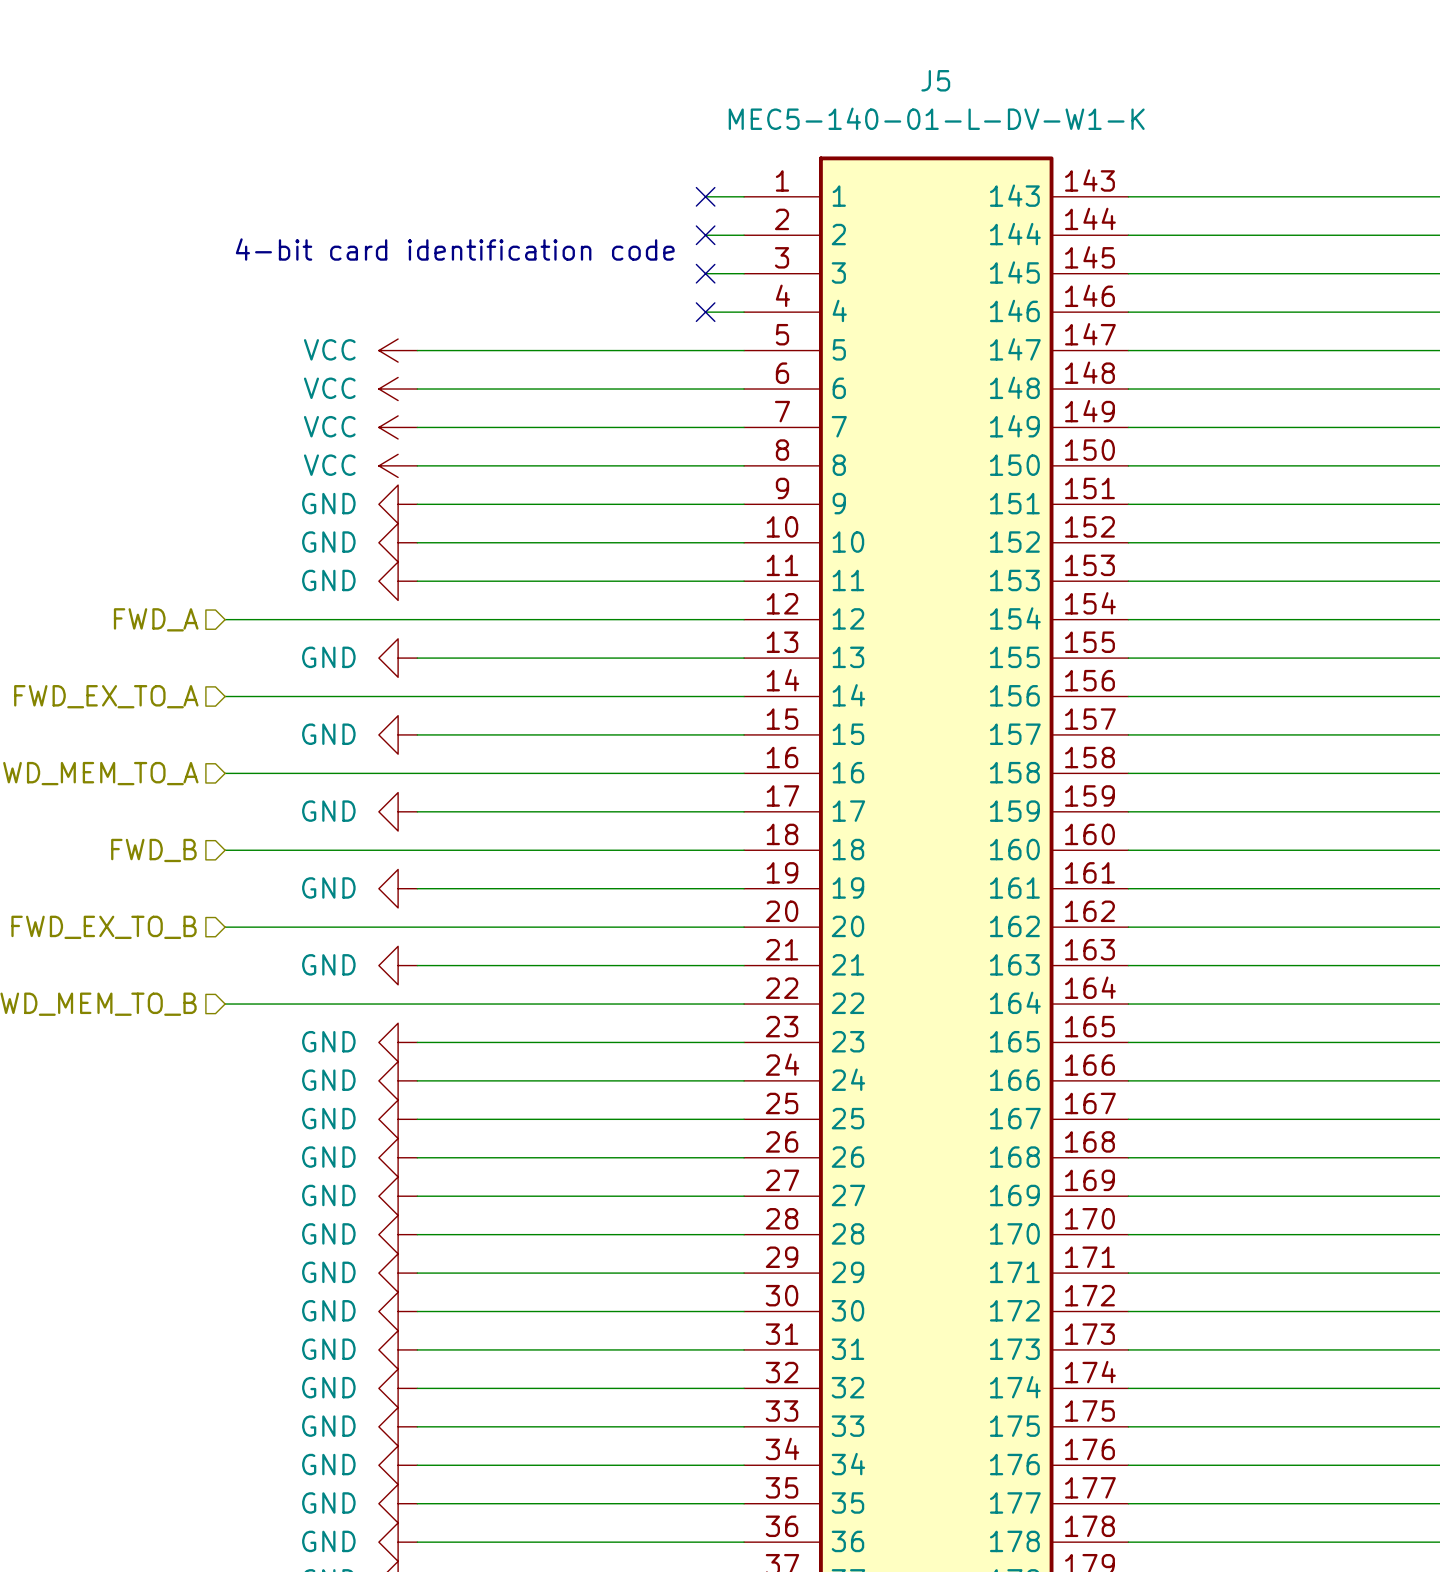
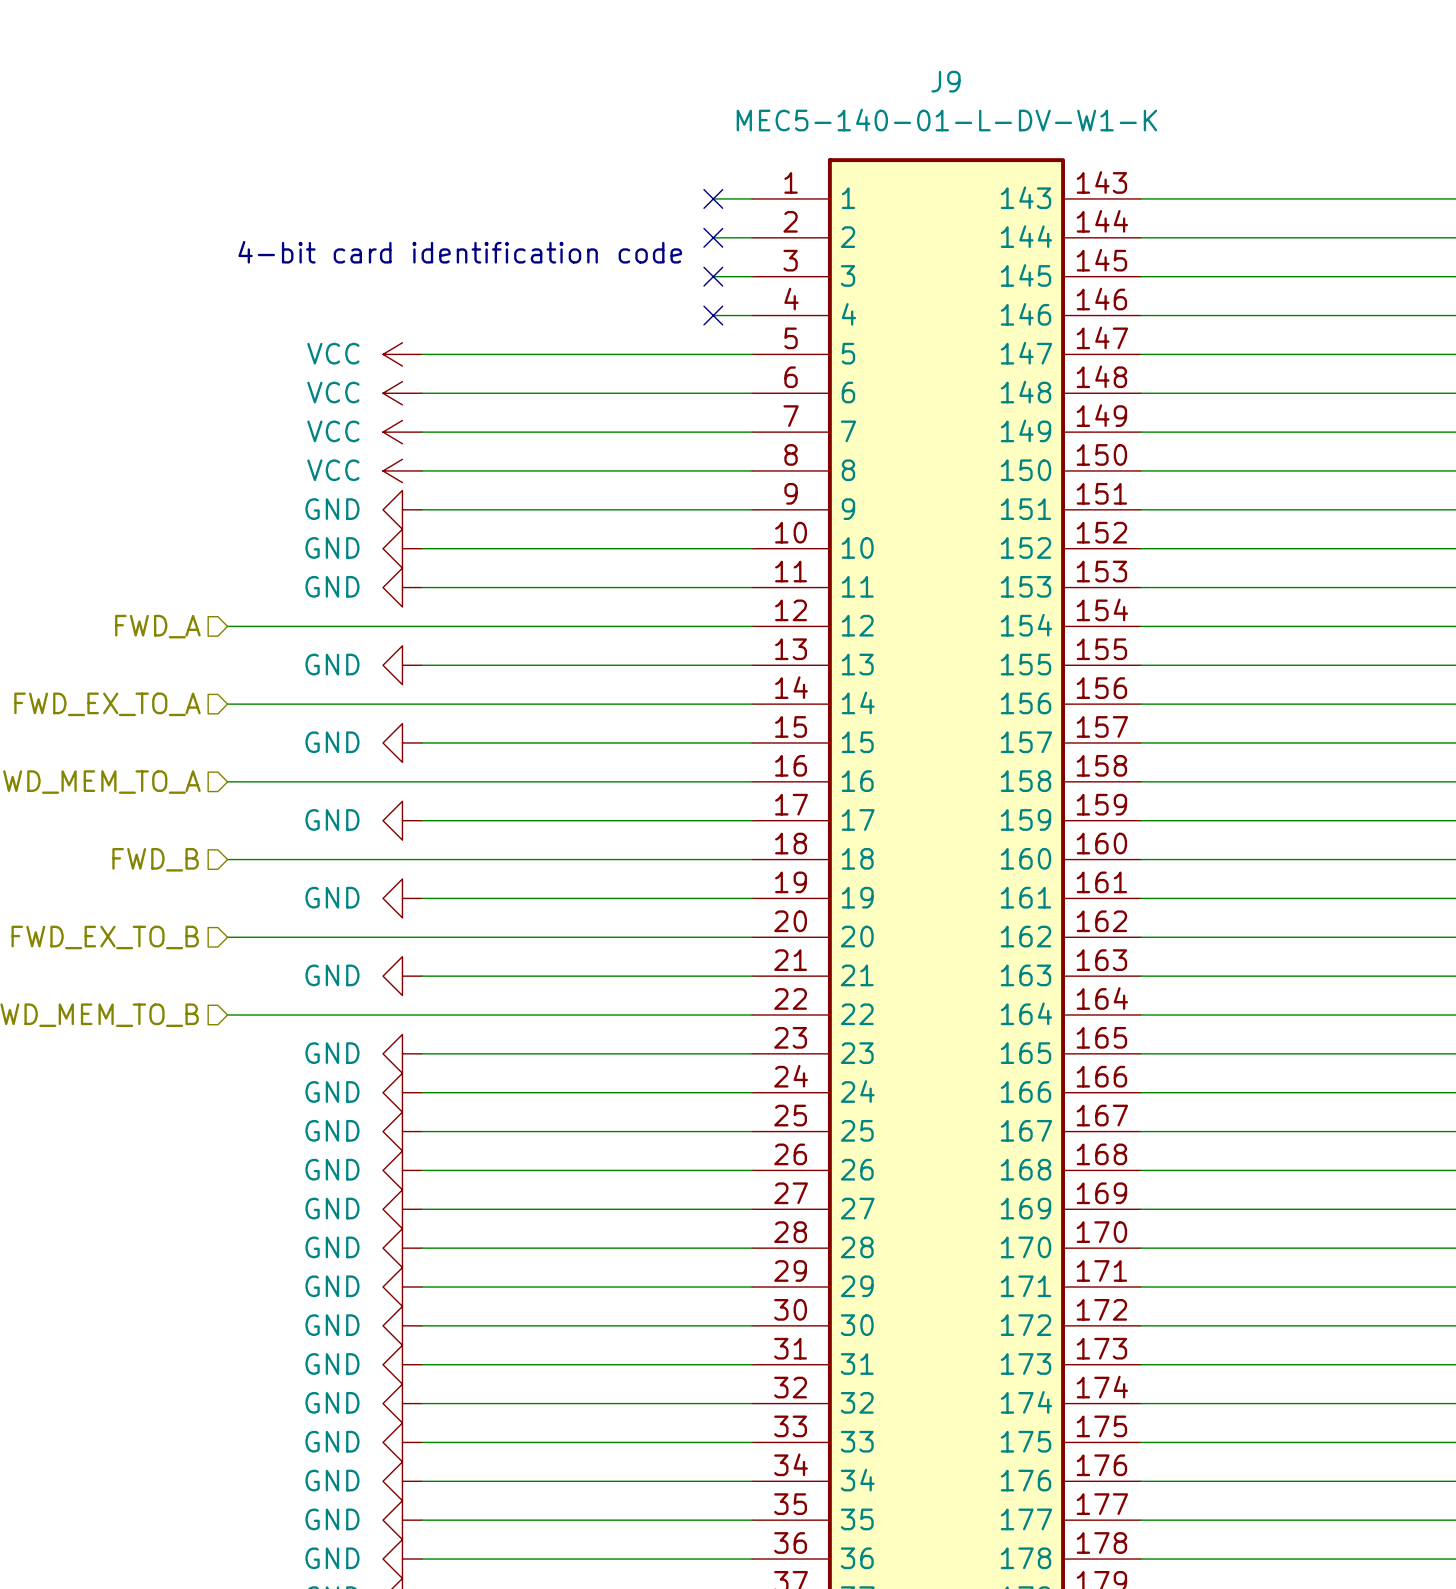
J5 name: J5 (935, 80) -> J9 (946, 81)

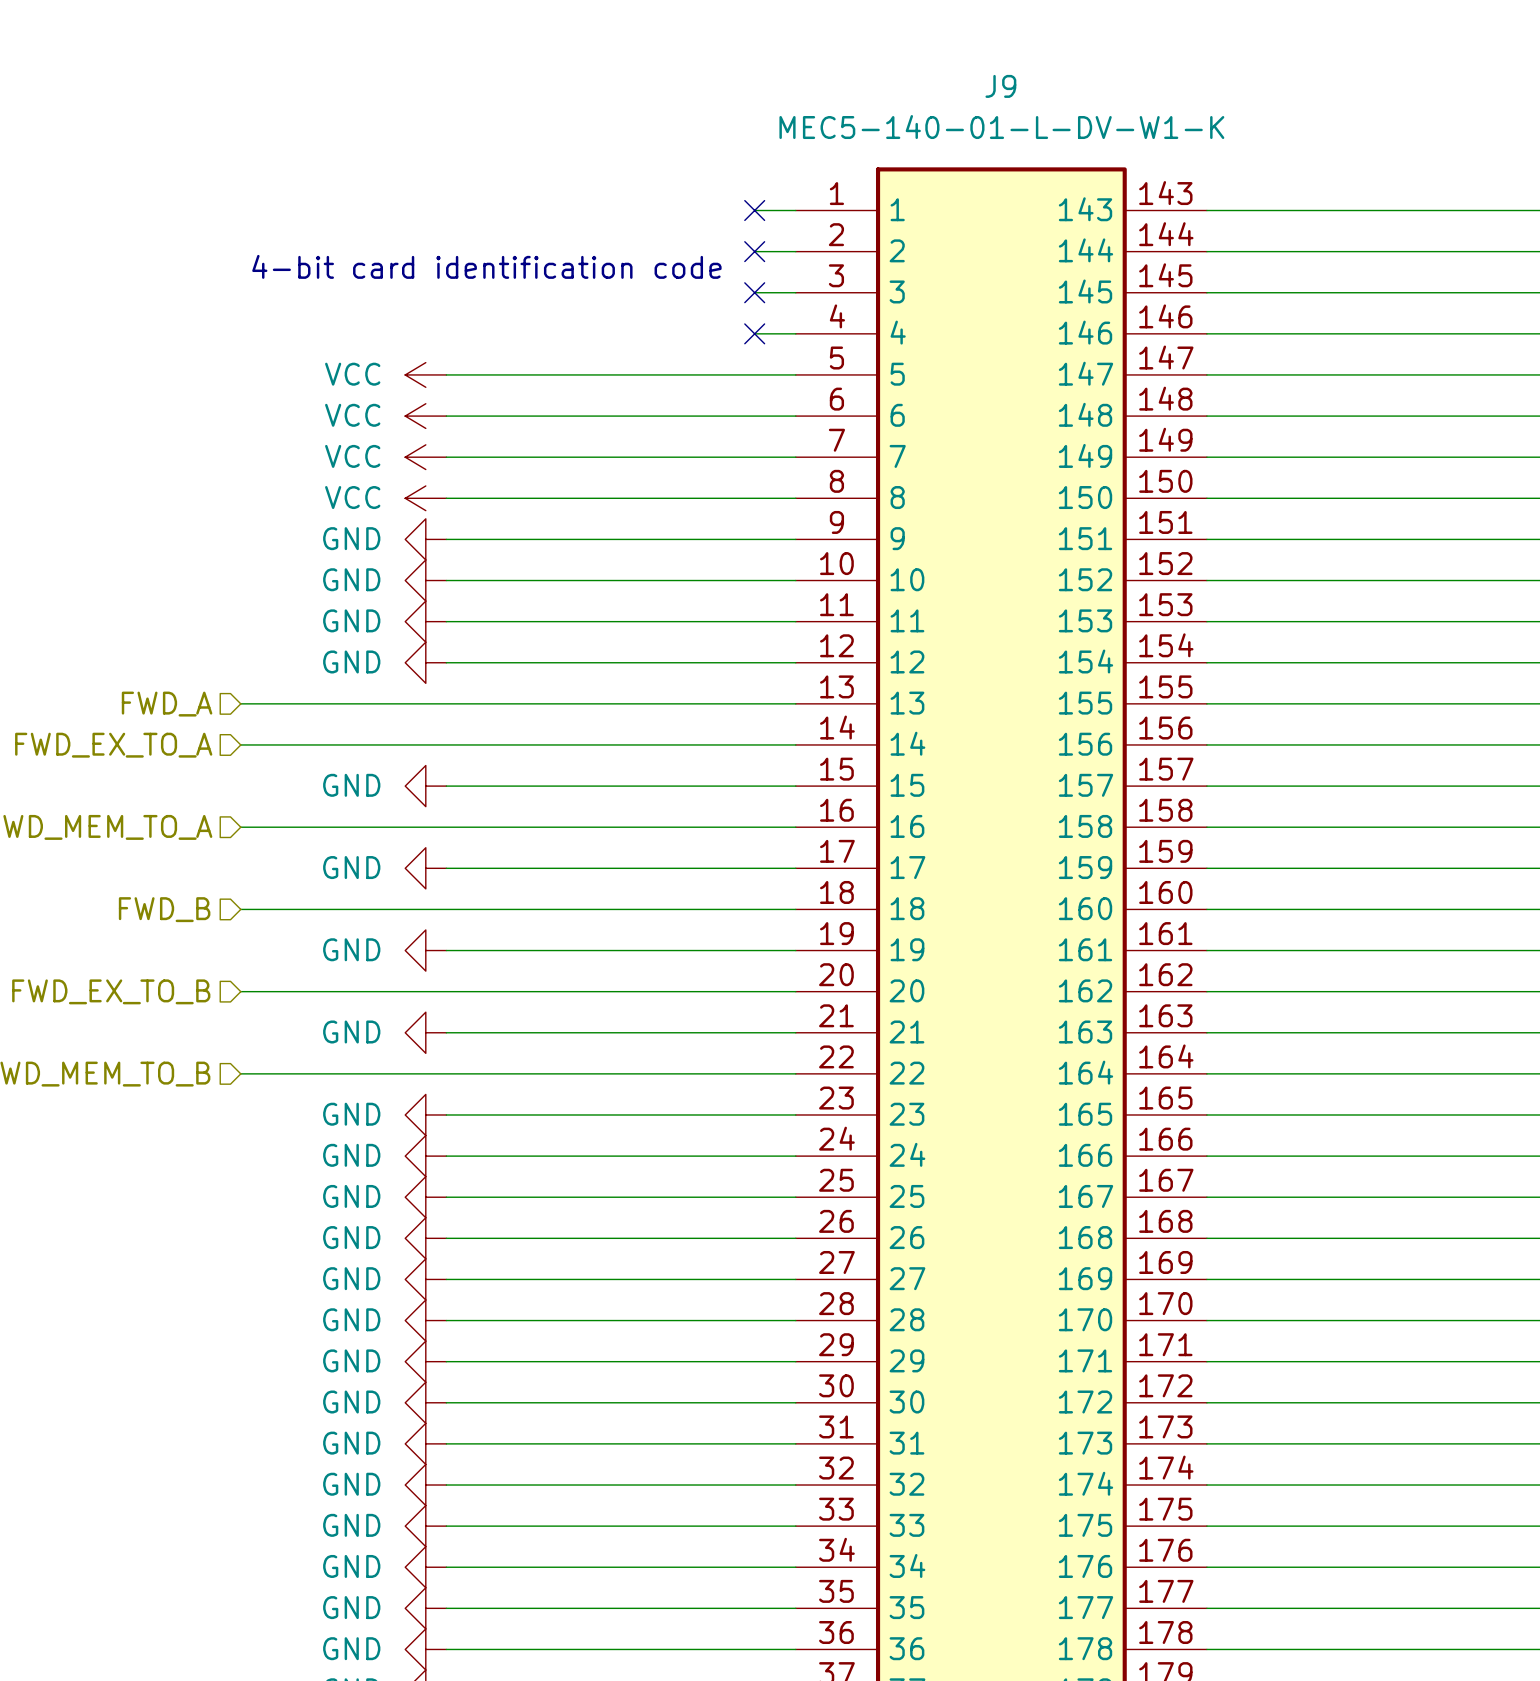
hierarchical label position: FWD_A (157, 626) -> FWD_A (167, 704)
wire: (227, 626) (421, 626) -> (240, 703) (446, 703)
power symbol position: GND (402, 665) -> GND (425, 662)

